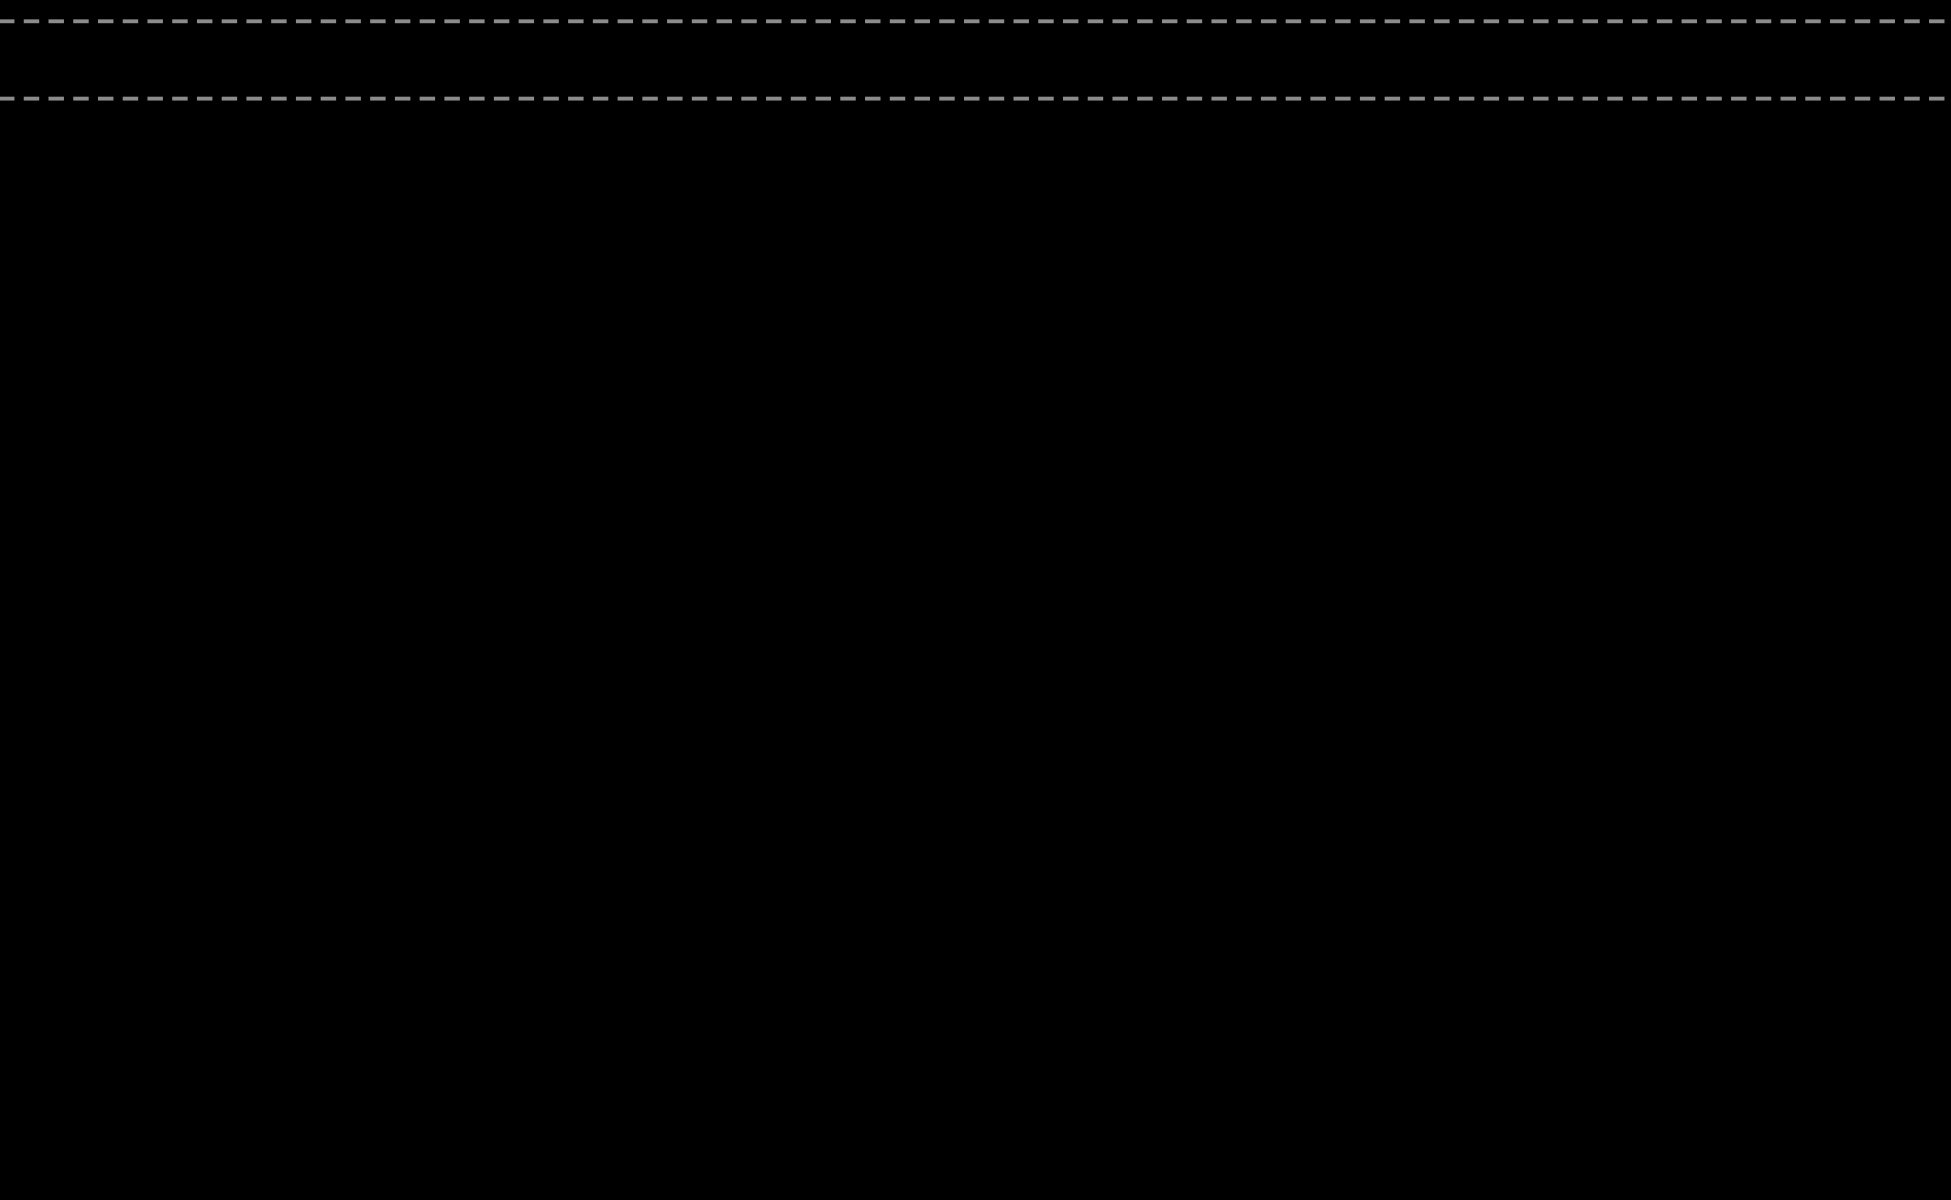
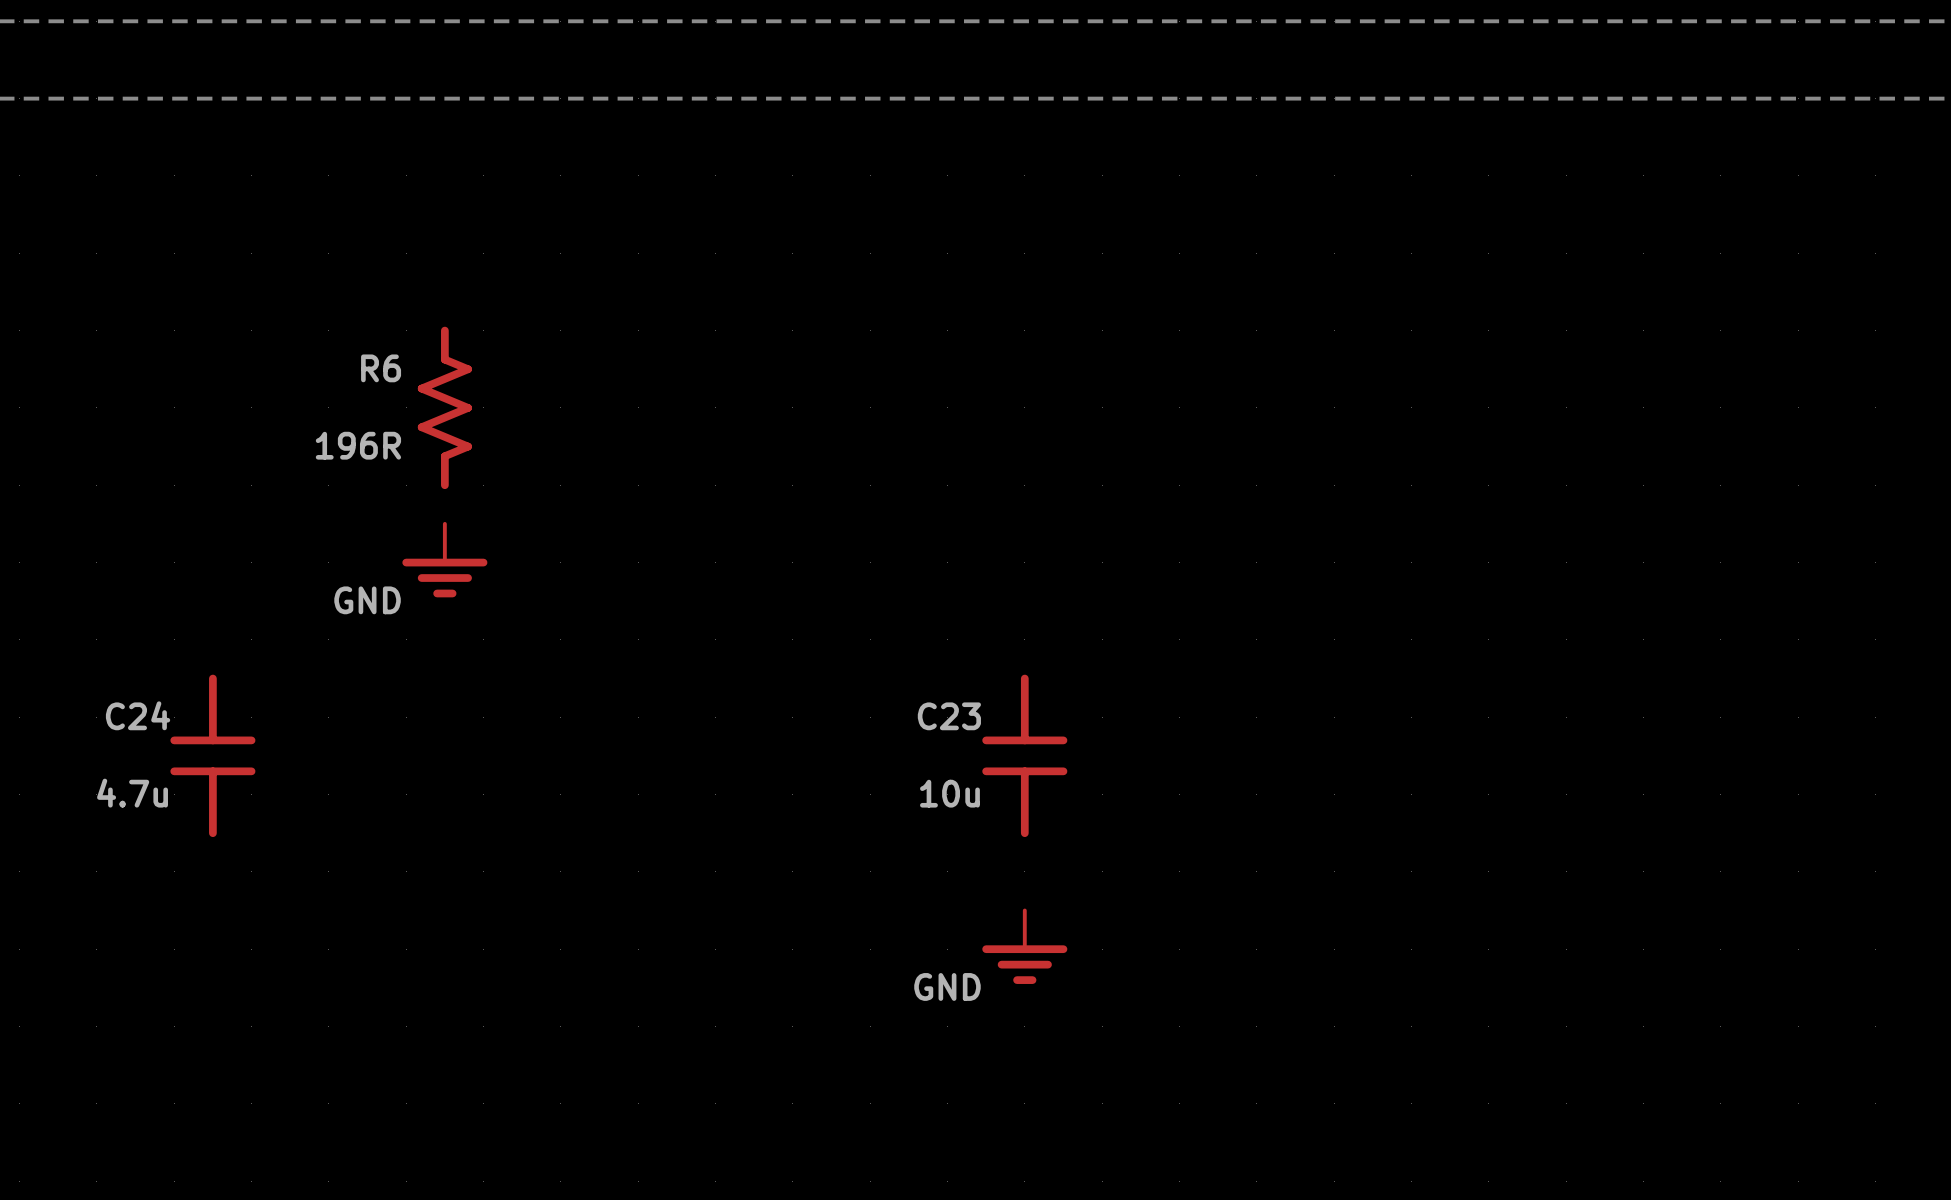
R6: none -> 196R (444, 407)
power symbol: none -> GND (444, 559)
C24: none -> 4.7u (212, 755)
C23: none -> 10u (1024, 755)
power symbol: none -> GND (1024, 946)

